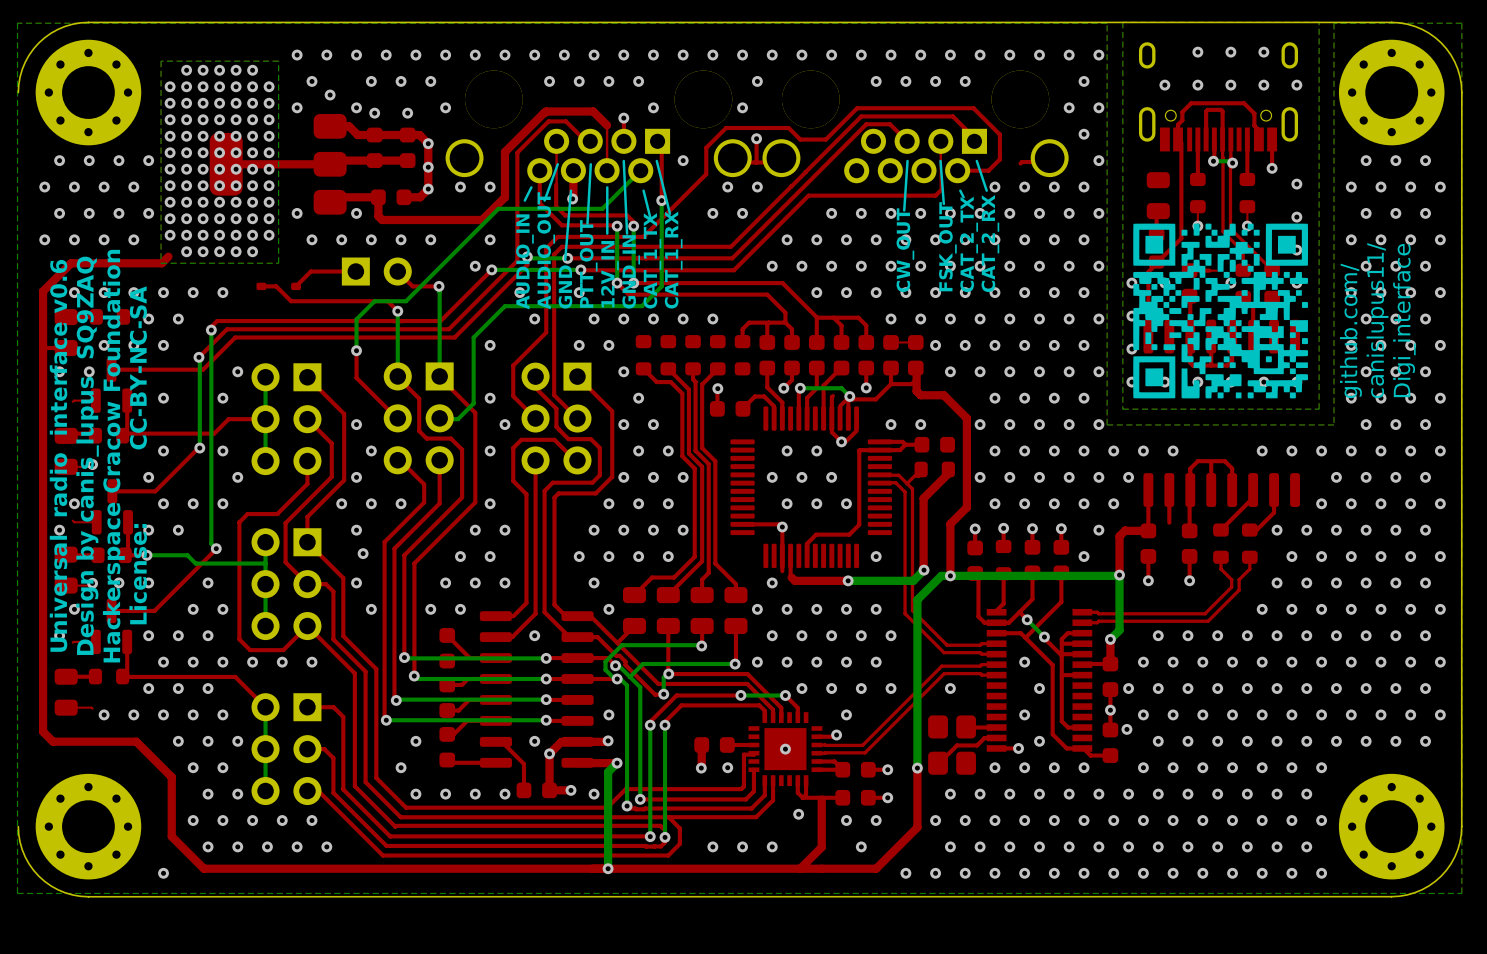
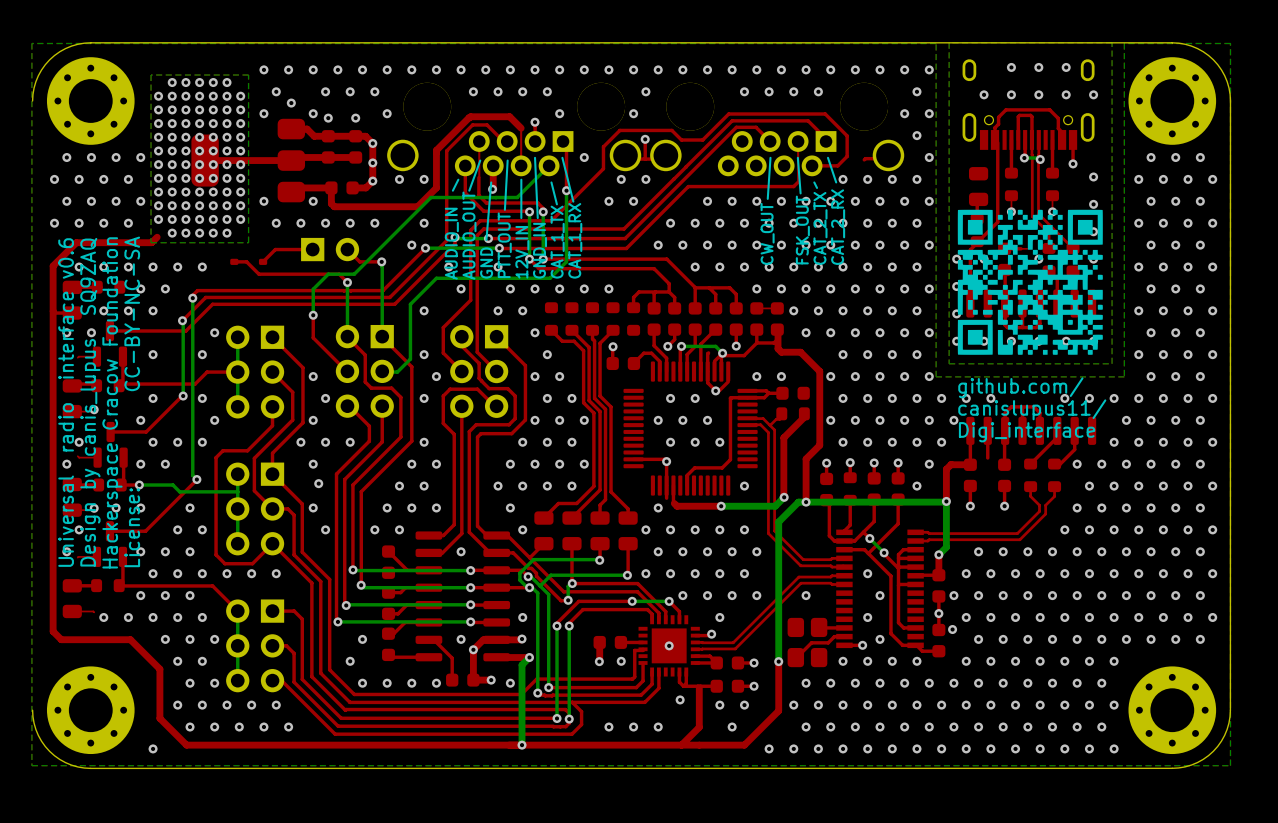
text rotation: 0° (1377, 320) -> 90° clockwise (1032, 409)
text position: canislupus11/ (1377, 320) -> canislupus11/ (1032, 409)
text rotation: 0° (1404, 320) -> 90° clockwise (1027, 432)
text position: Digi_interface (1404, 320) -> Digi_interface (1027, 432)
text rotation: 0° (1350, 330) -> 90° clockwise (1020, 387)

